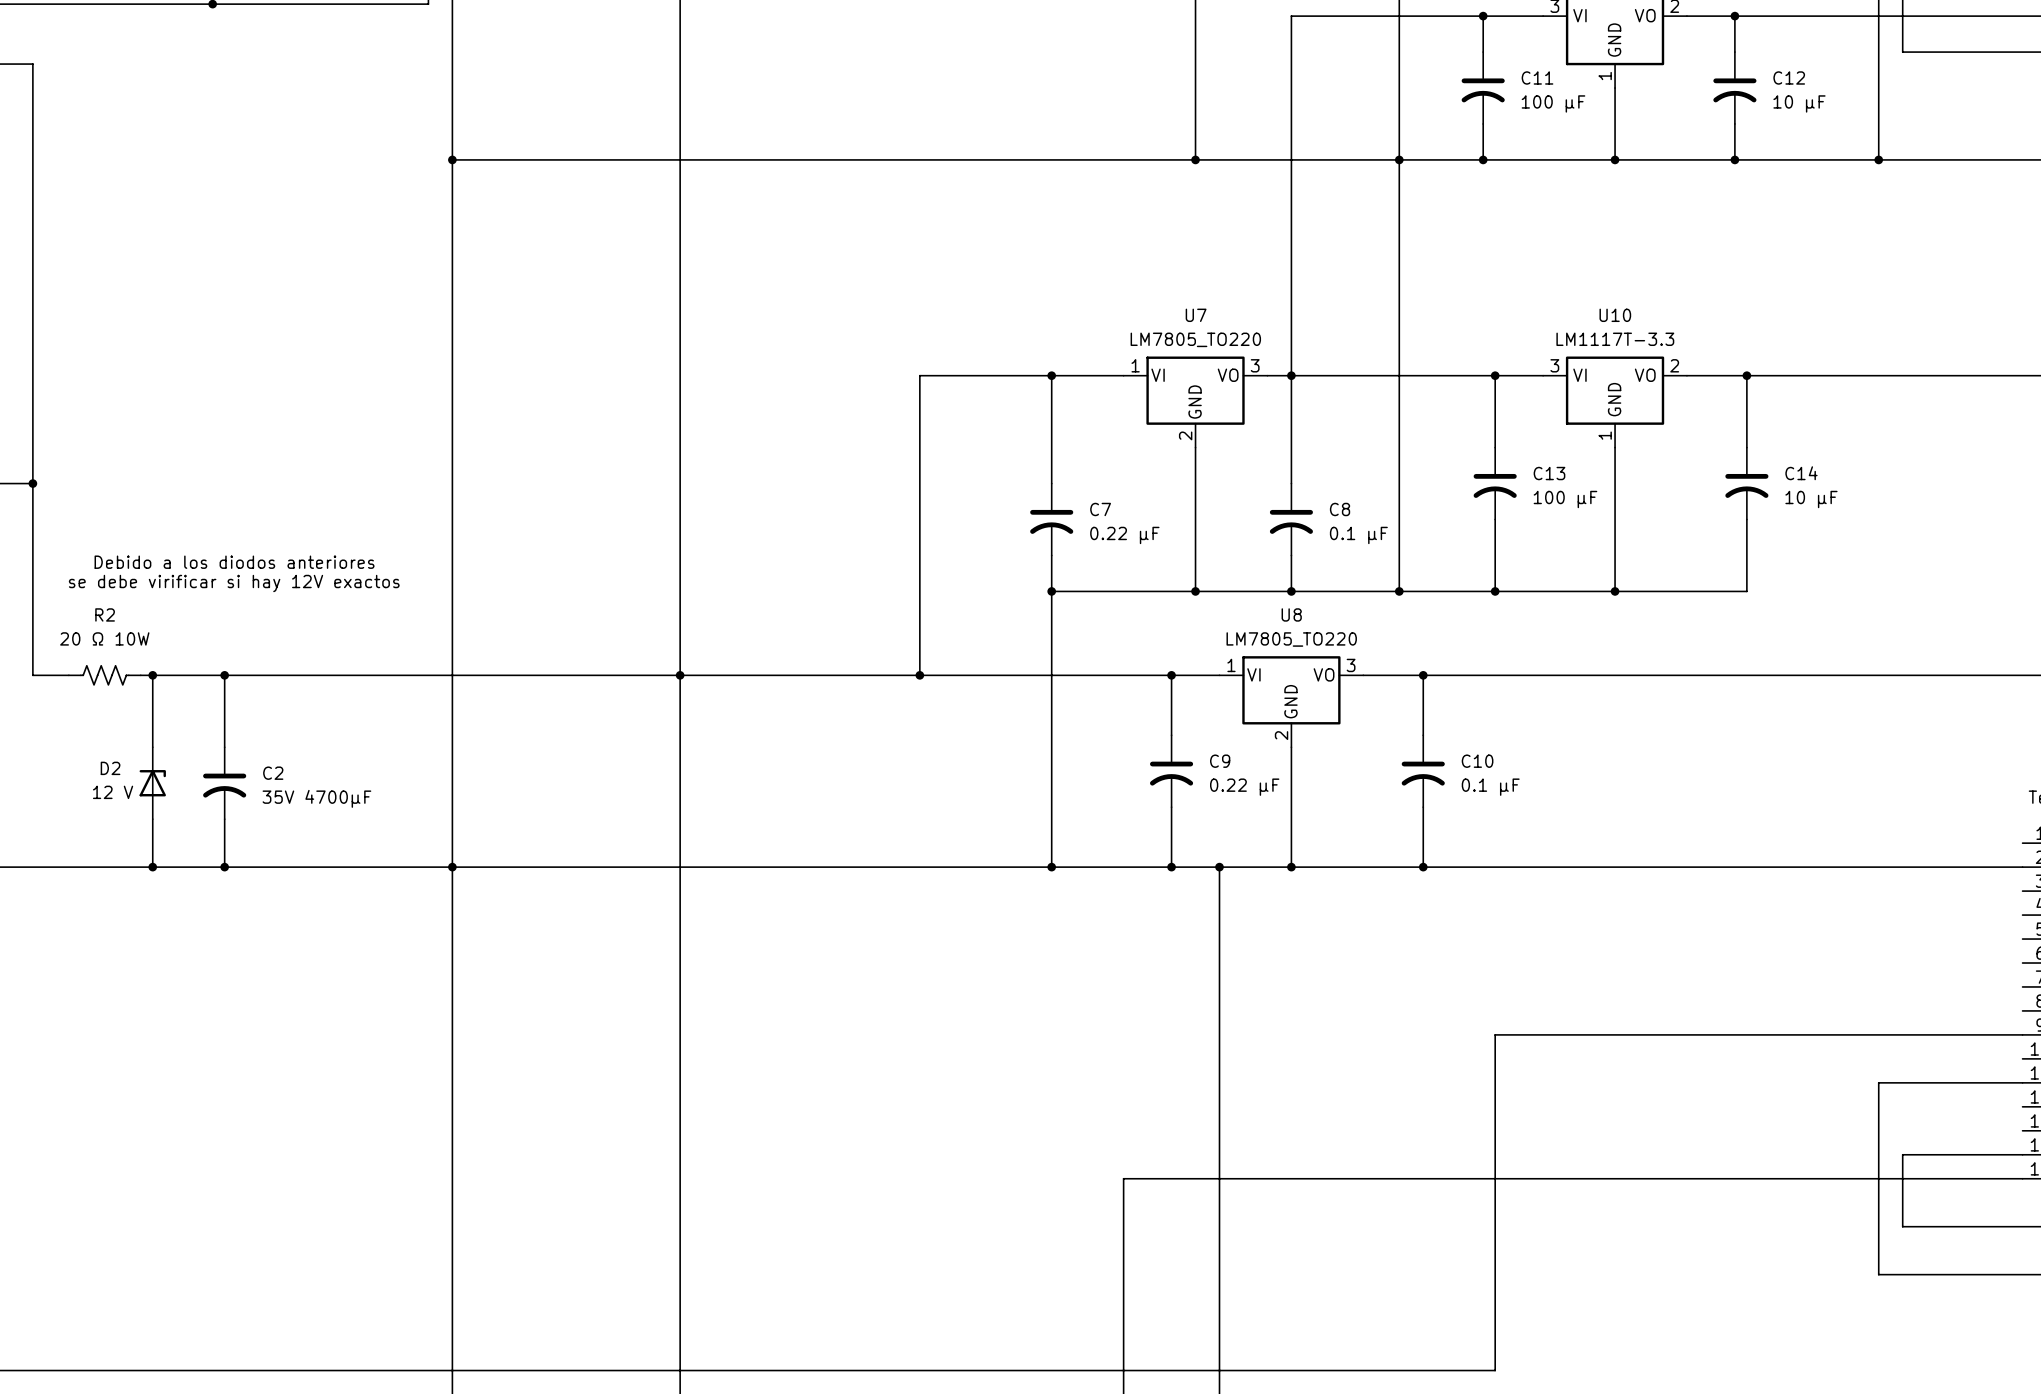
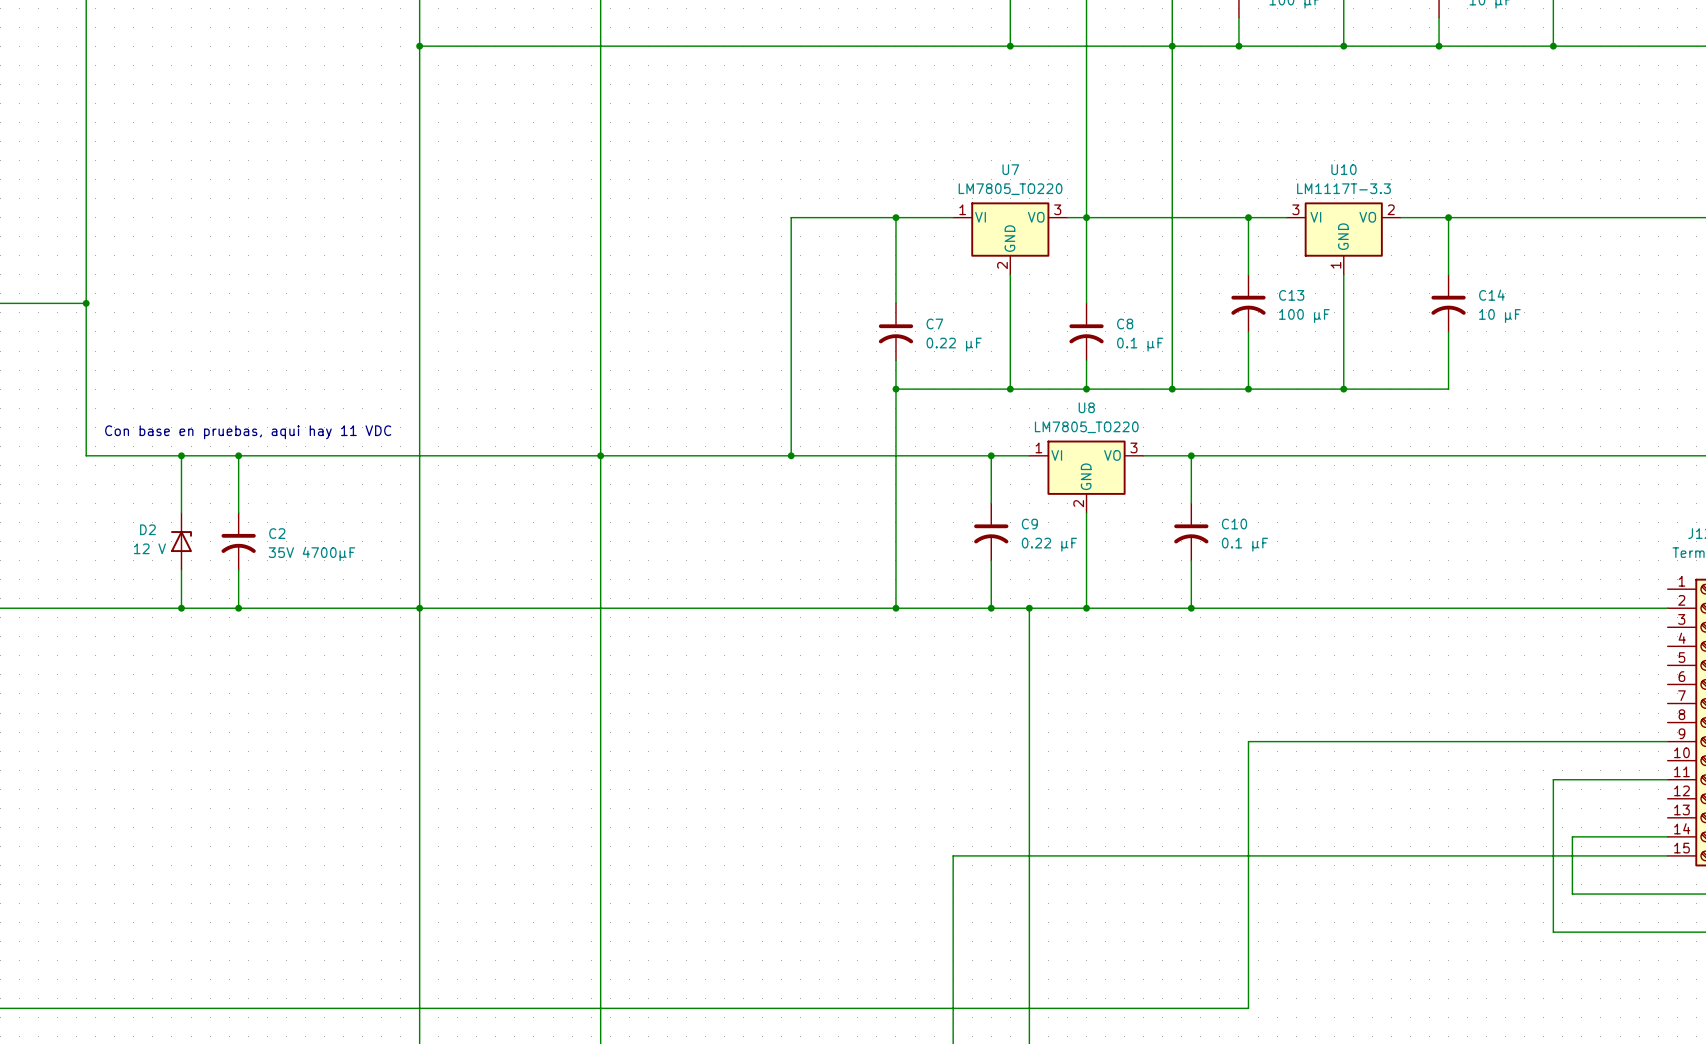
text: Debido a los diodos anteriores (234, 562) -> none
text: se debe virificar si hay 12V exactos (234, 583) -> none
text: none -> Con base en pruebas, aqui hay 11 VDC (248, 432)
R2: 20 Ω 10W (104, 675) -> none

